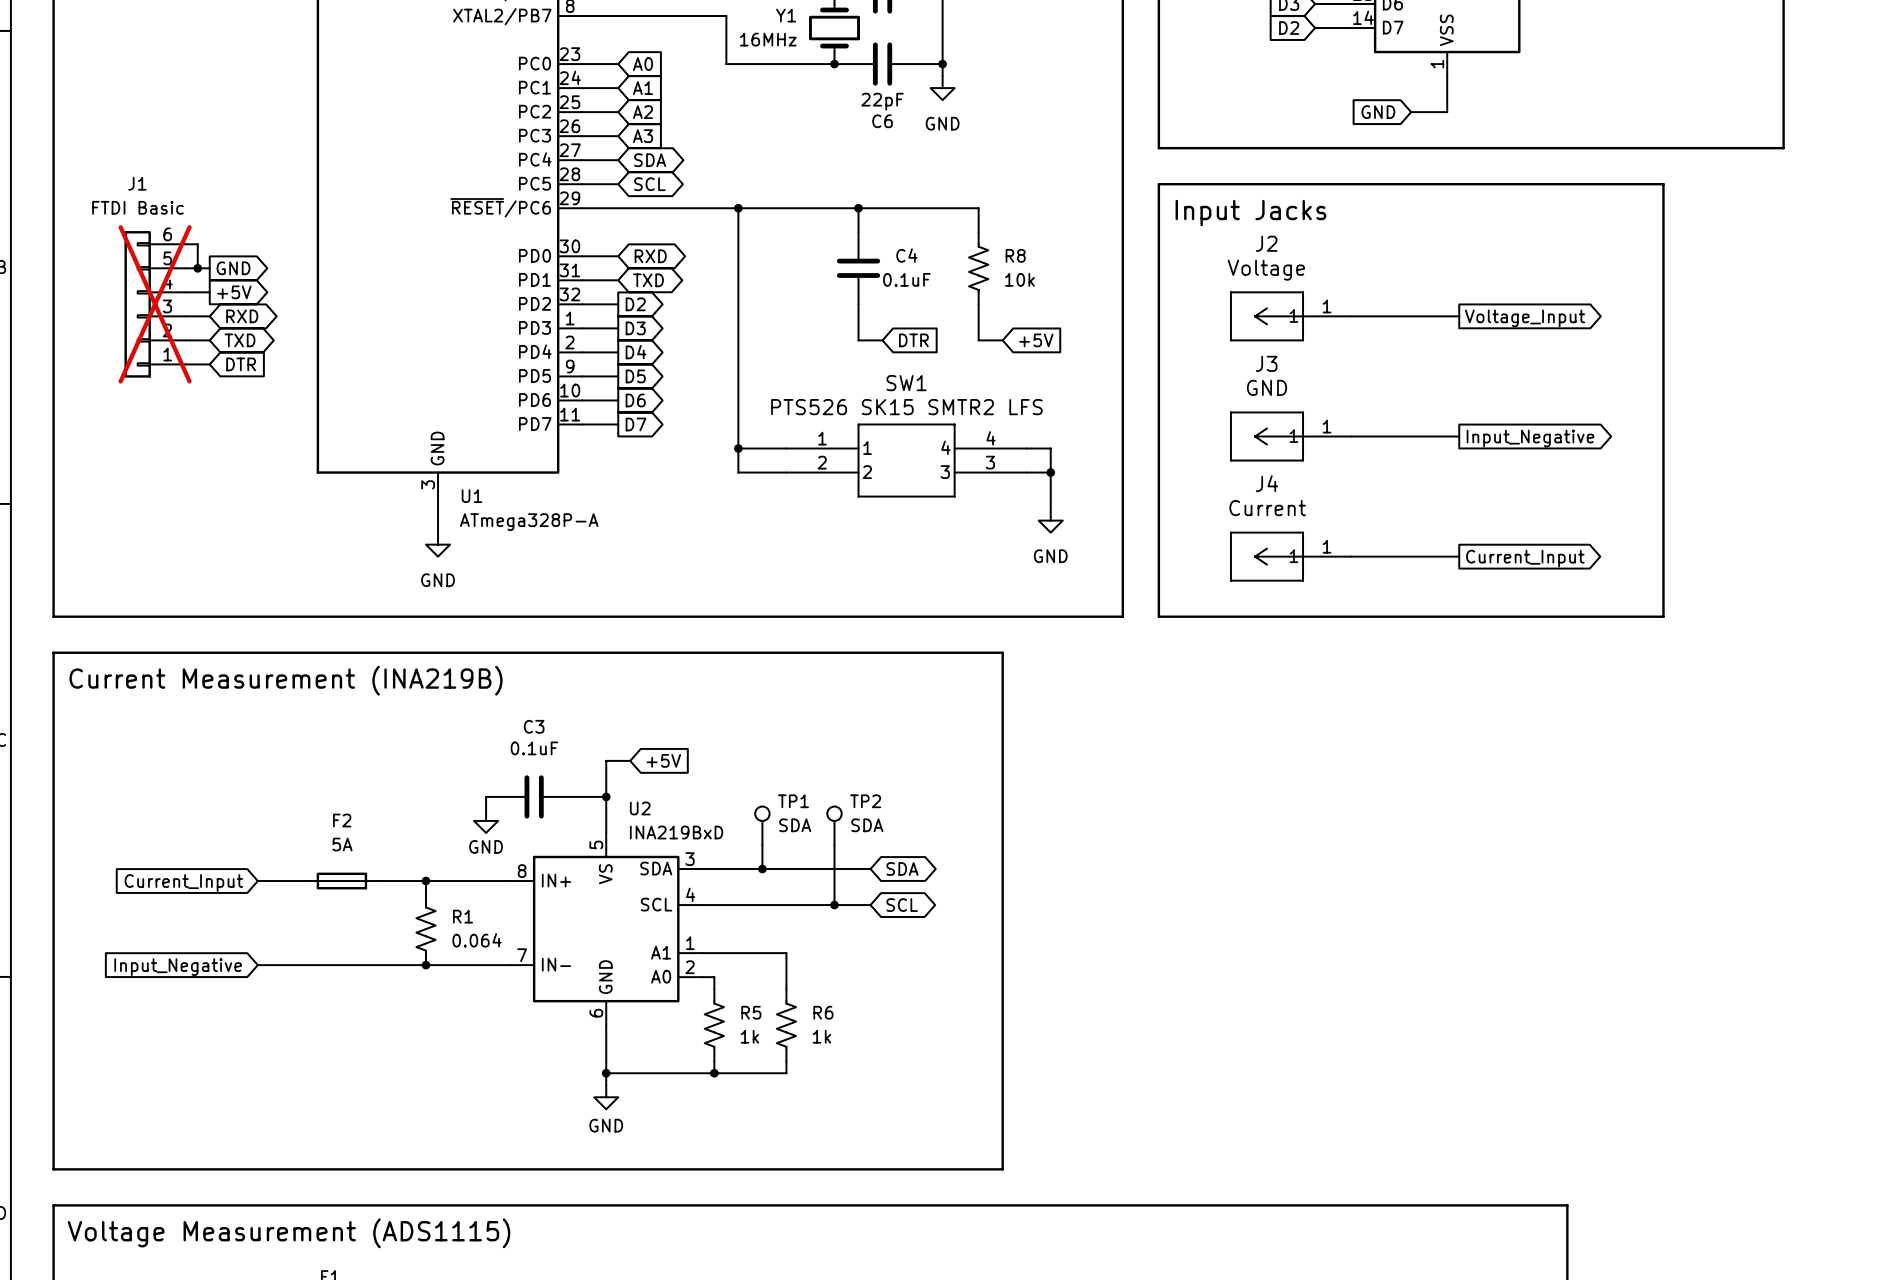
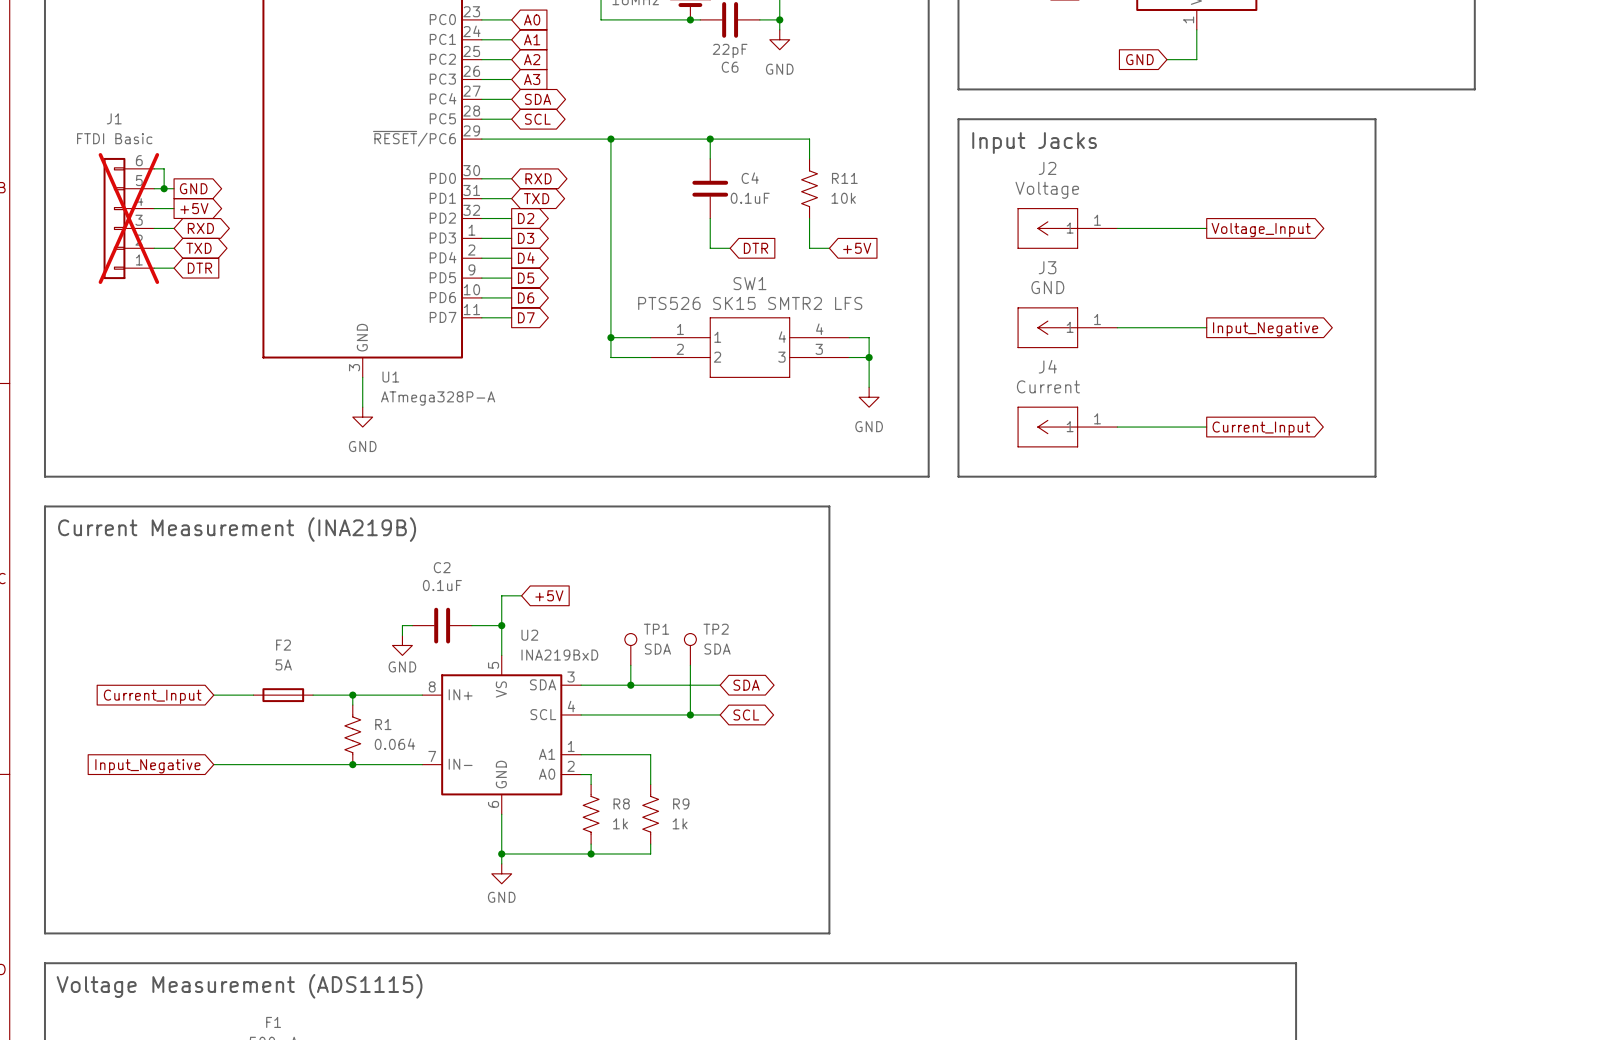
R8 name: R8 (1015, 255) -> R11 (844, 178)
C3 name: C3 (534, 726) -> C2 (442, 567)
R5 name: R5 (751, 1012) -> R8 (621, 803)
R6 name: R6 (823, 1012) -> R9 (681, 803)

